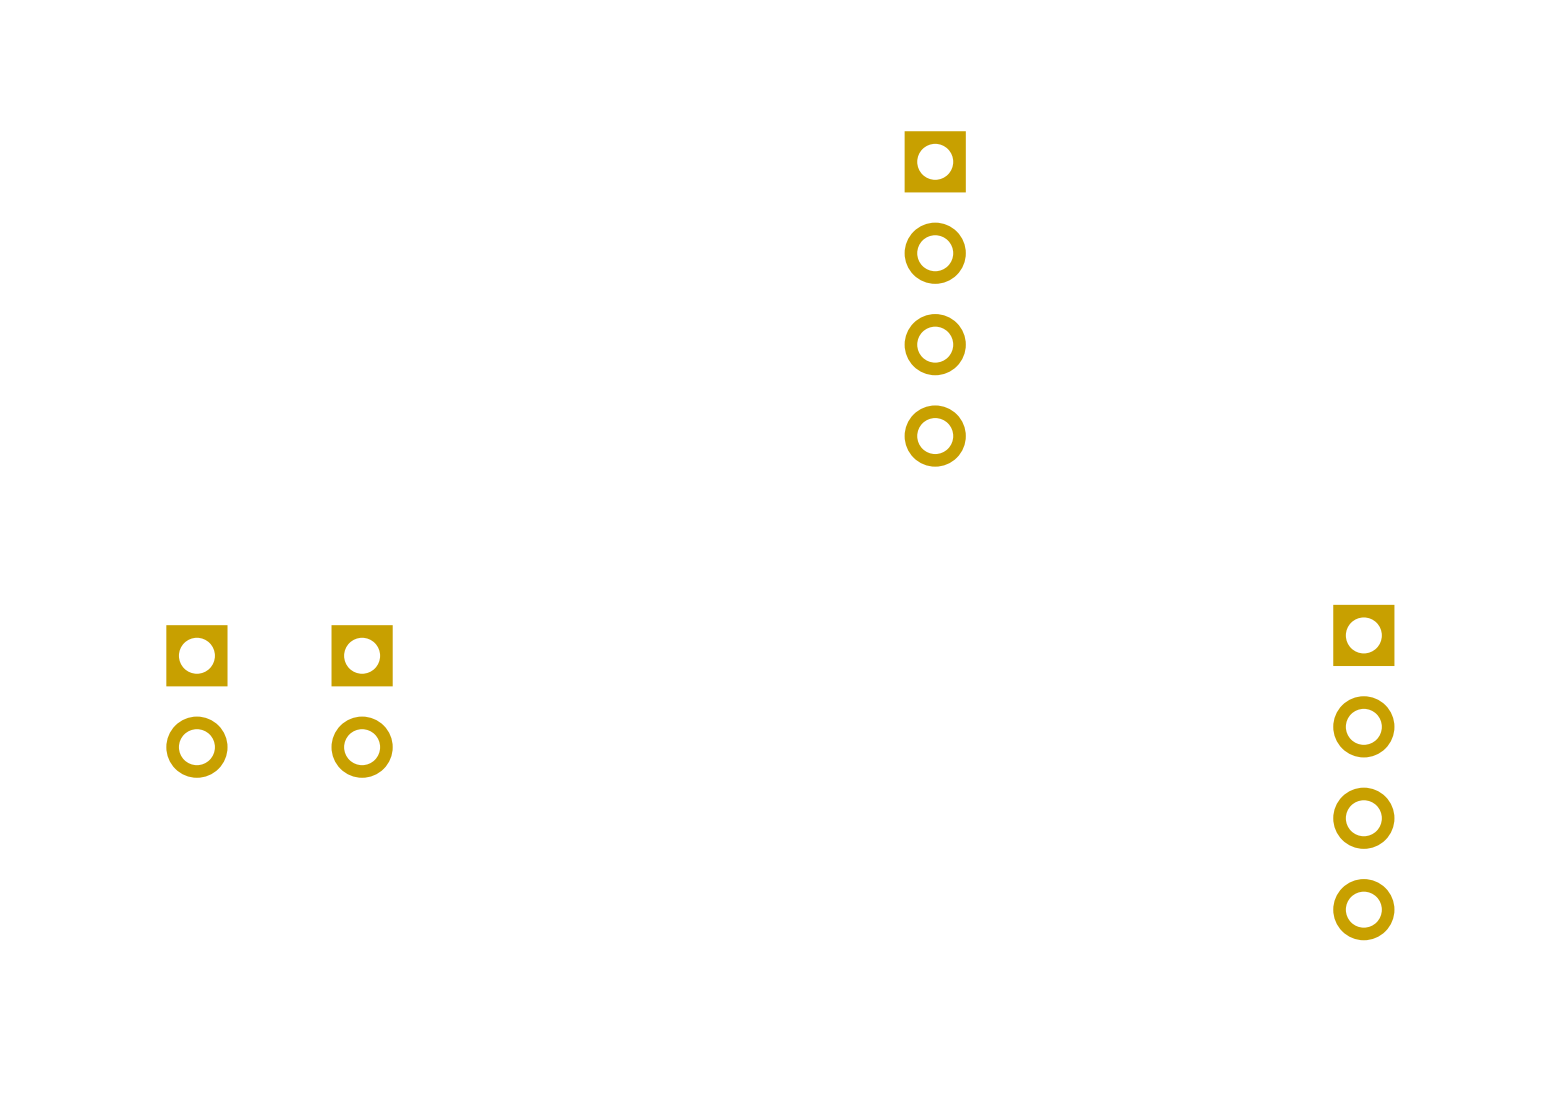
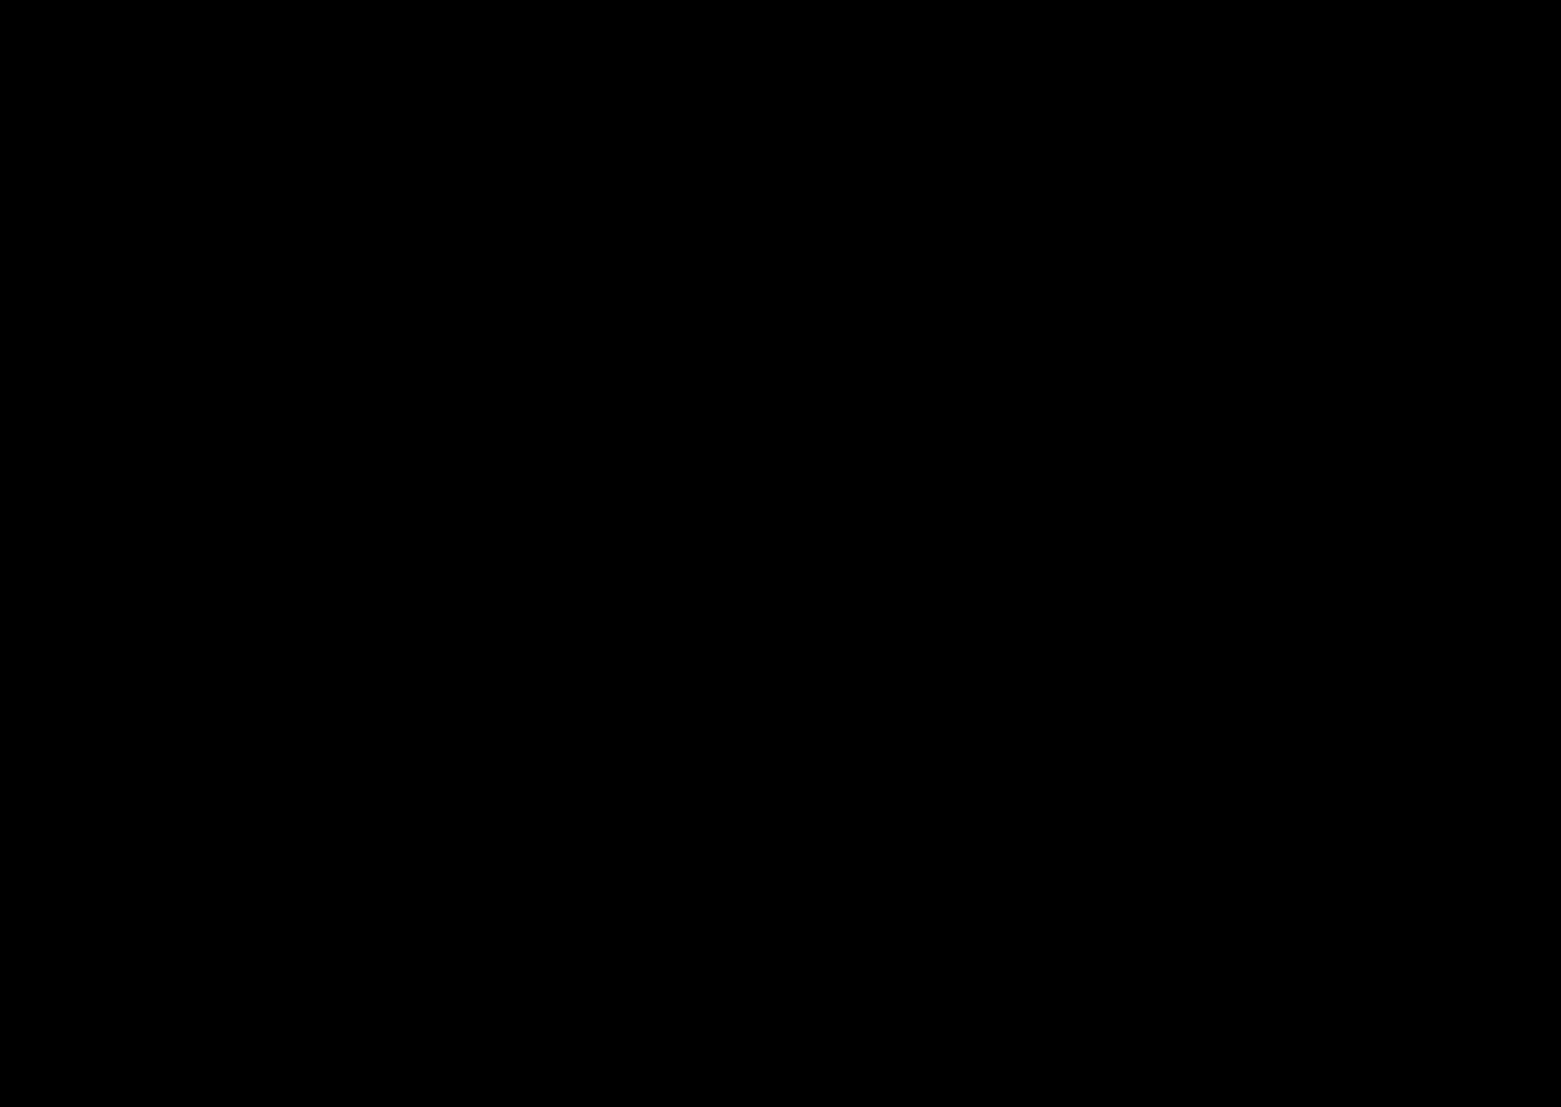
part: (935, 298) -> none
part: (196, 701) -> none
part: (362, 701) -> none
part: (1363, 772) -> none

